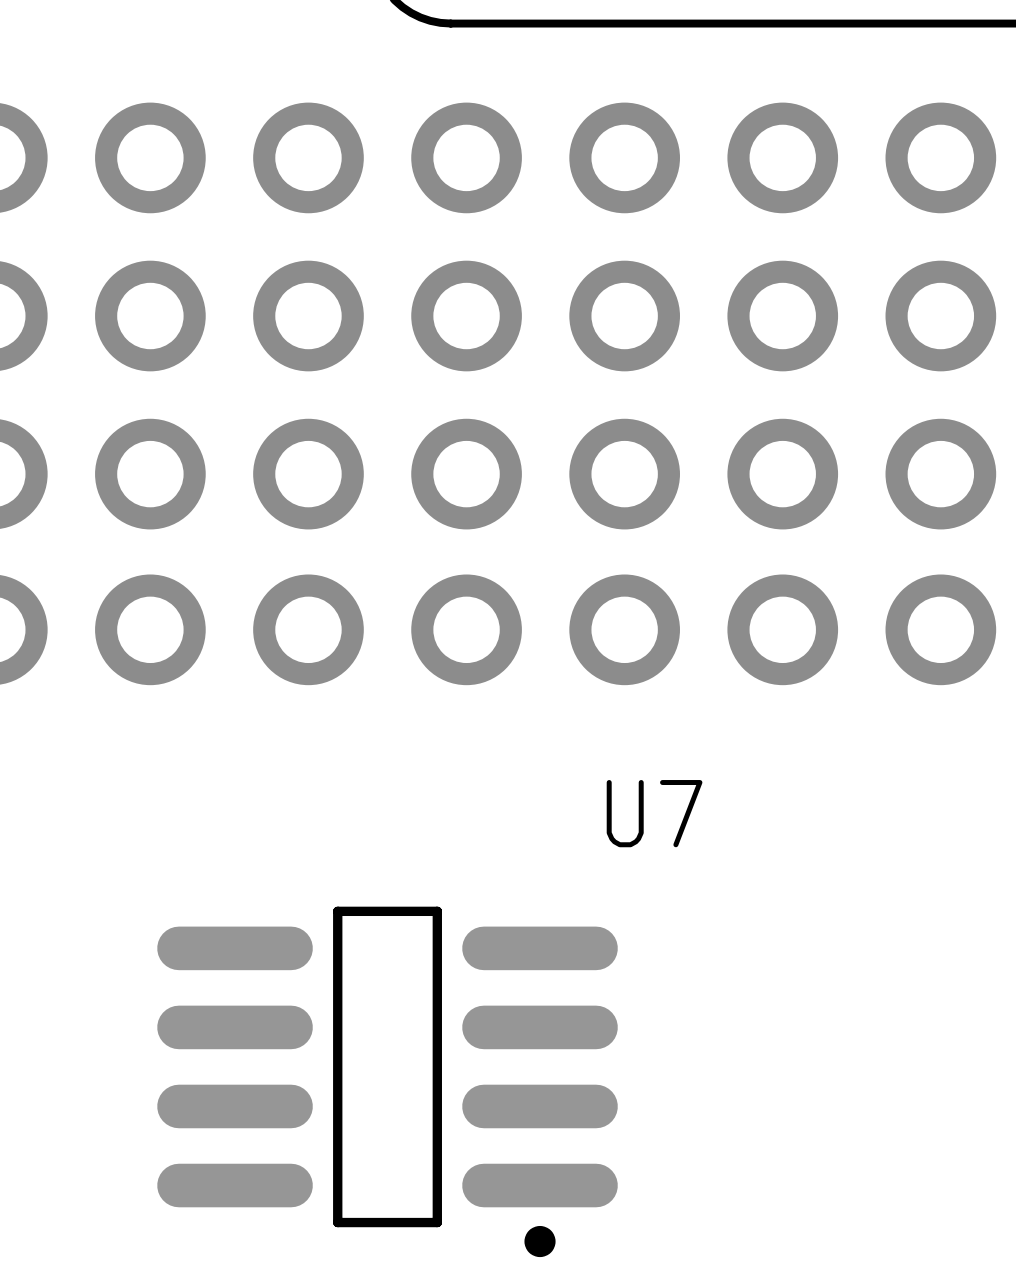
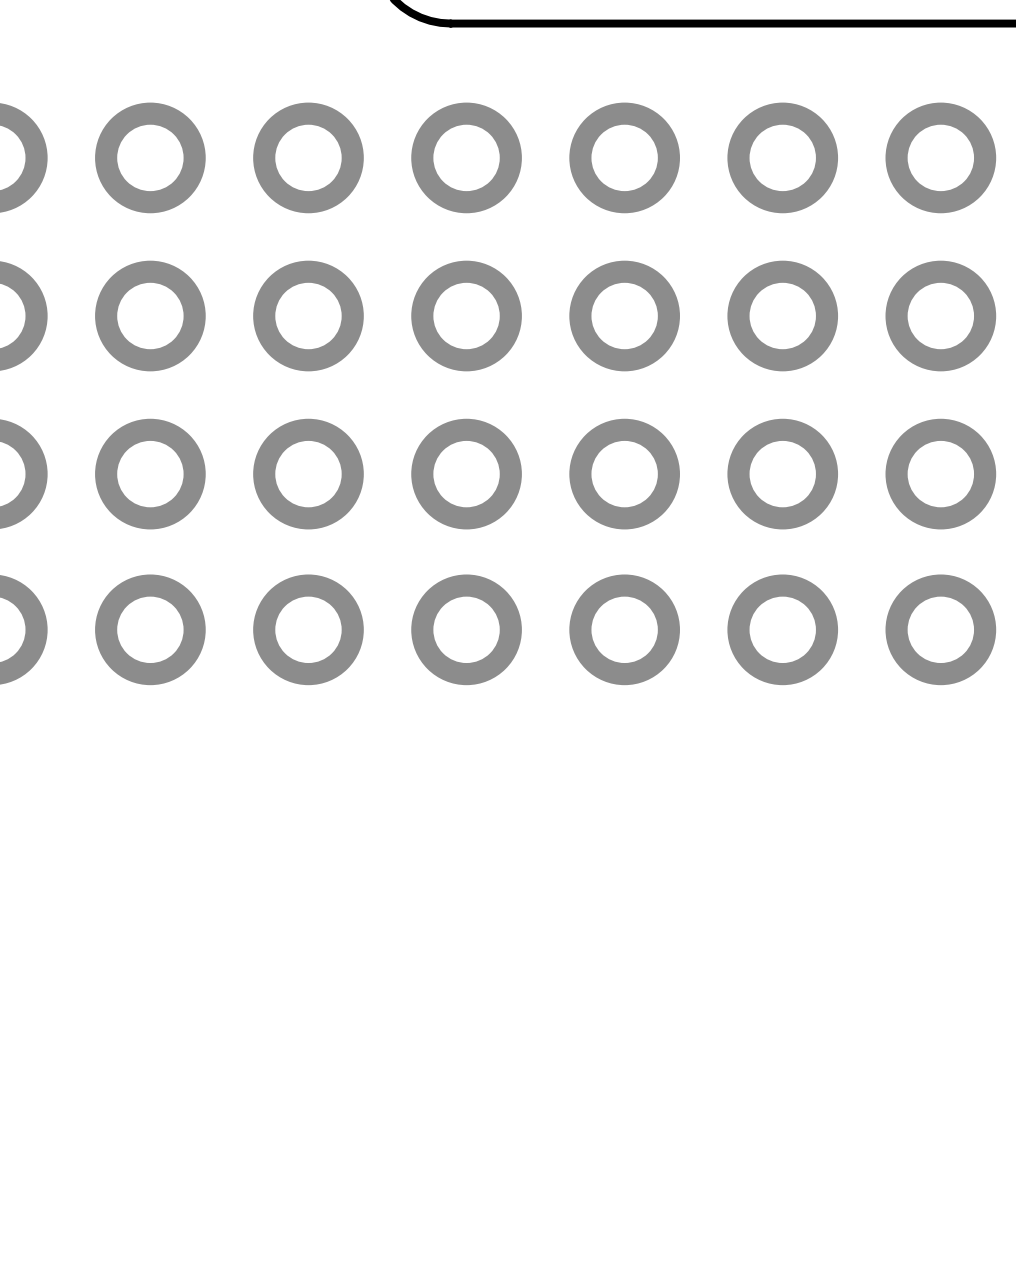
U7: (387, 1081) -> none

